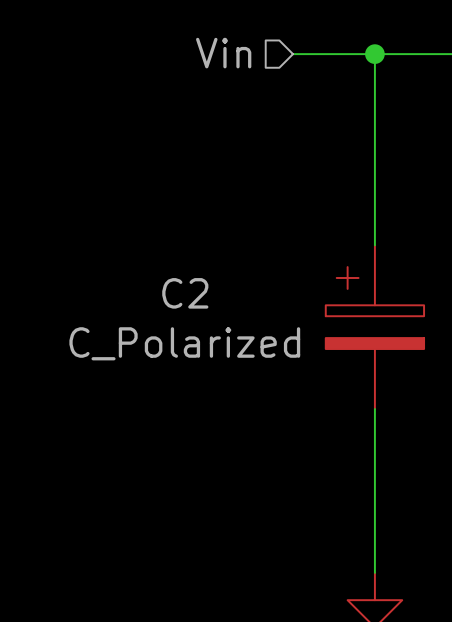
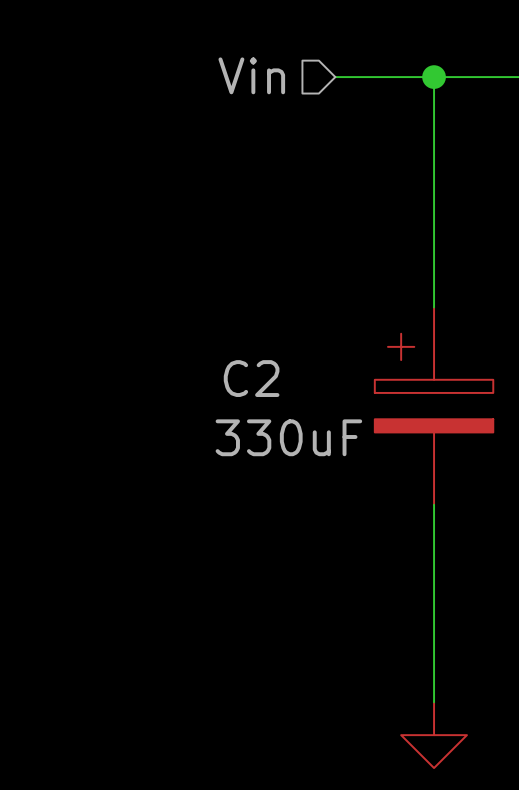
C2 name position: C2 (185, 293) -> C2 (251, 378)
C2 value: C_Polarized (184, 343) -> 330uF (288, 437)

